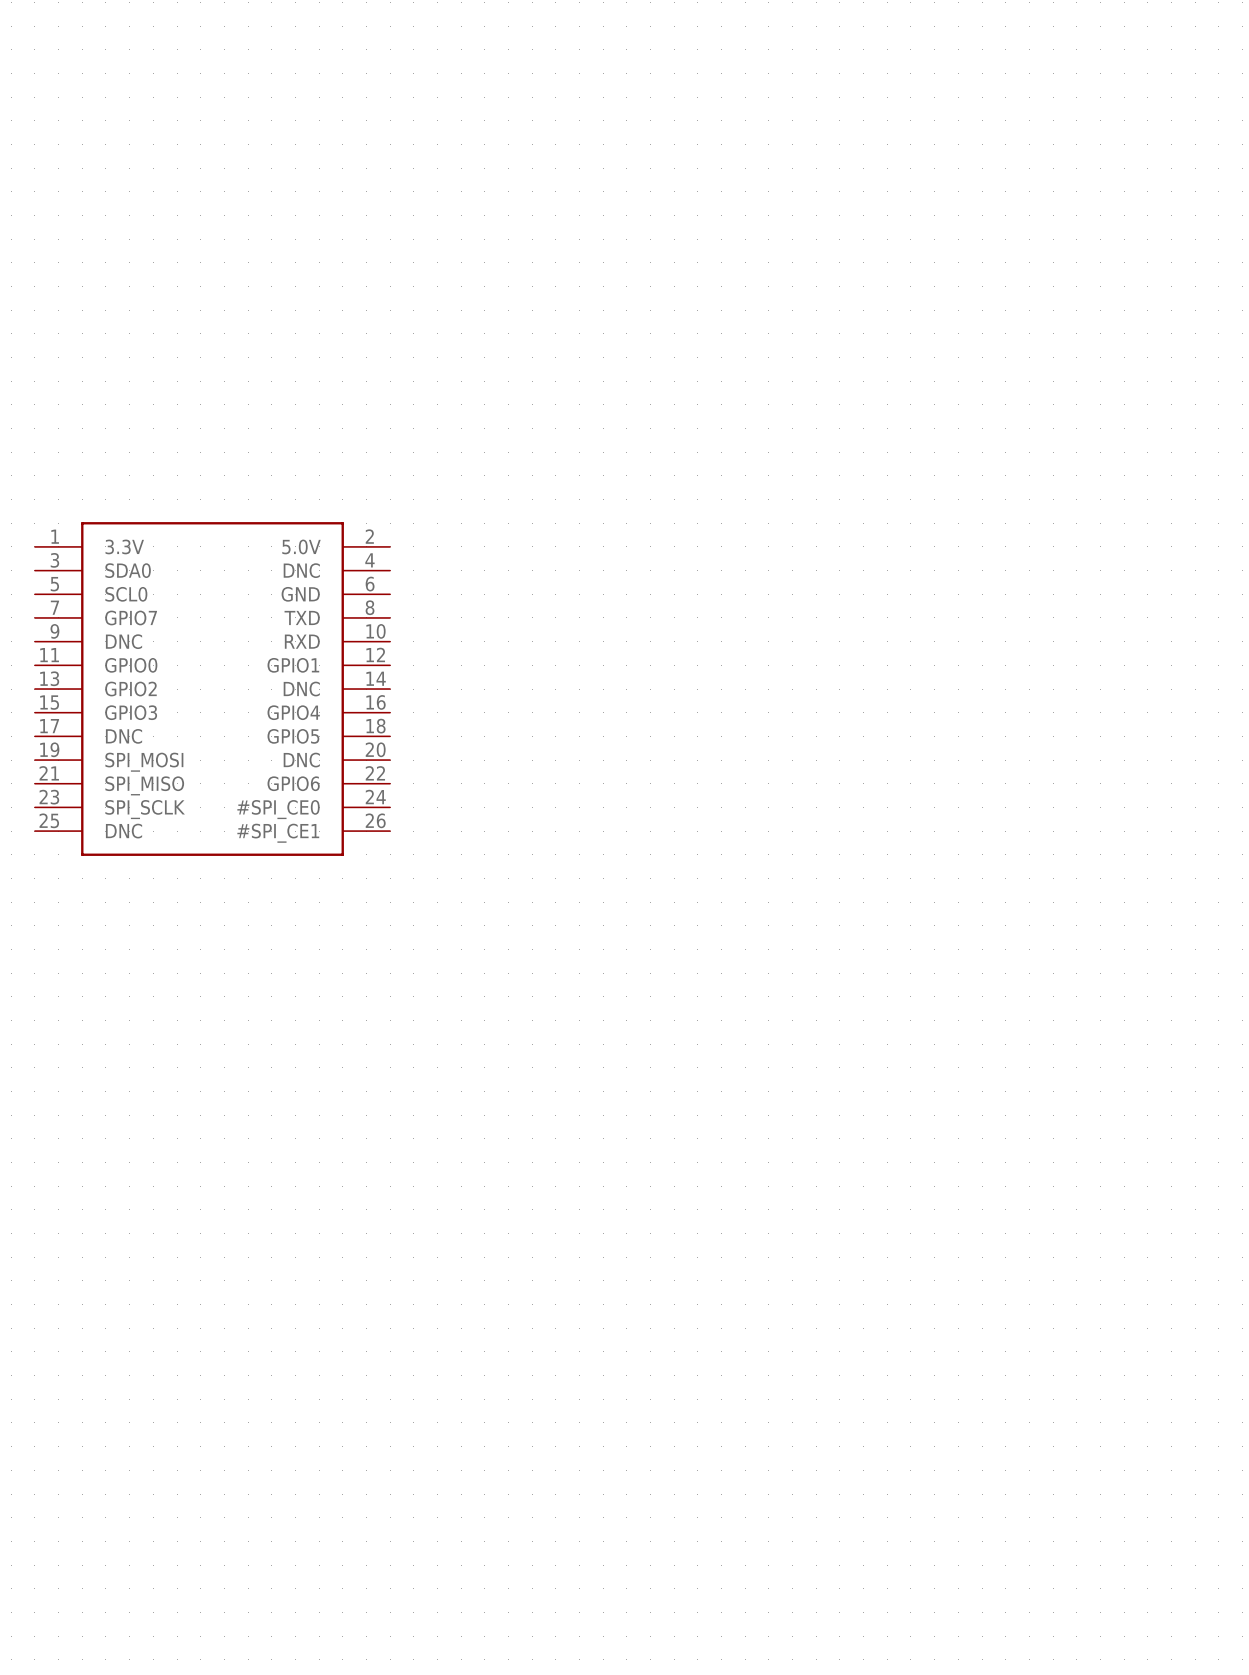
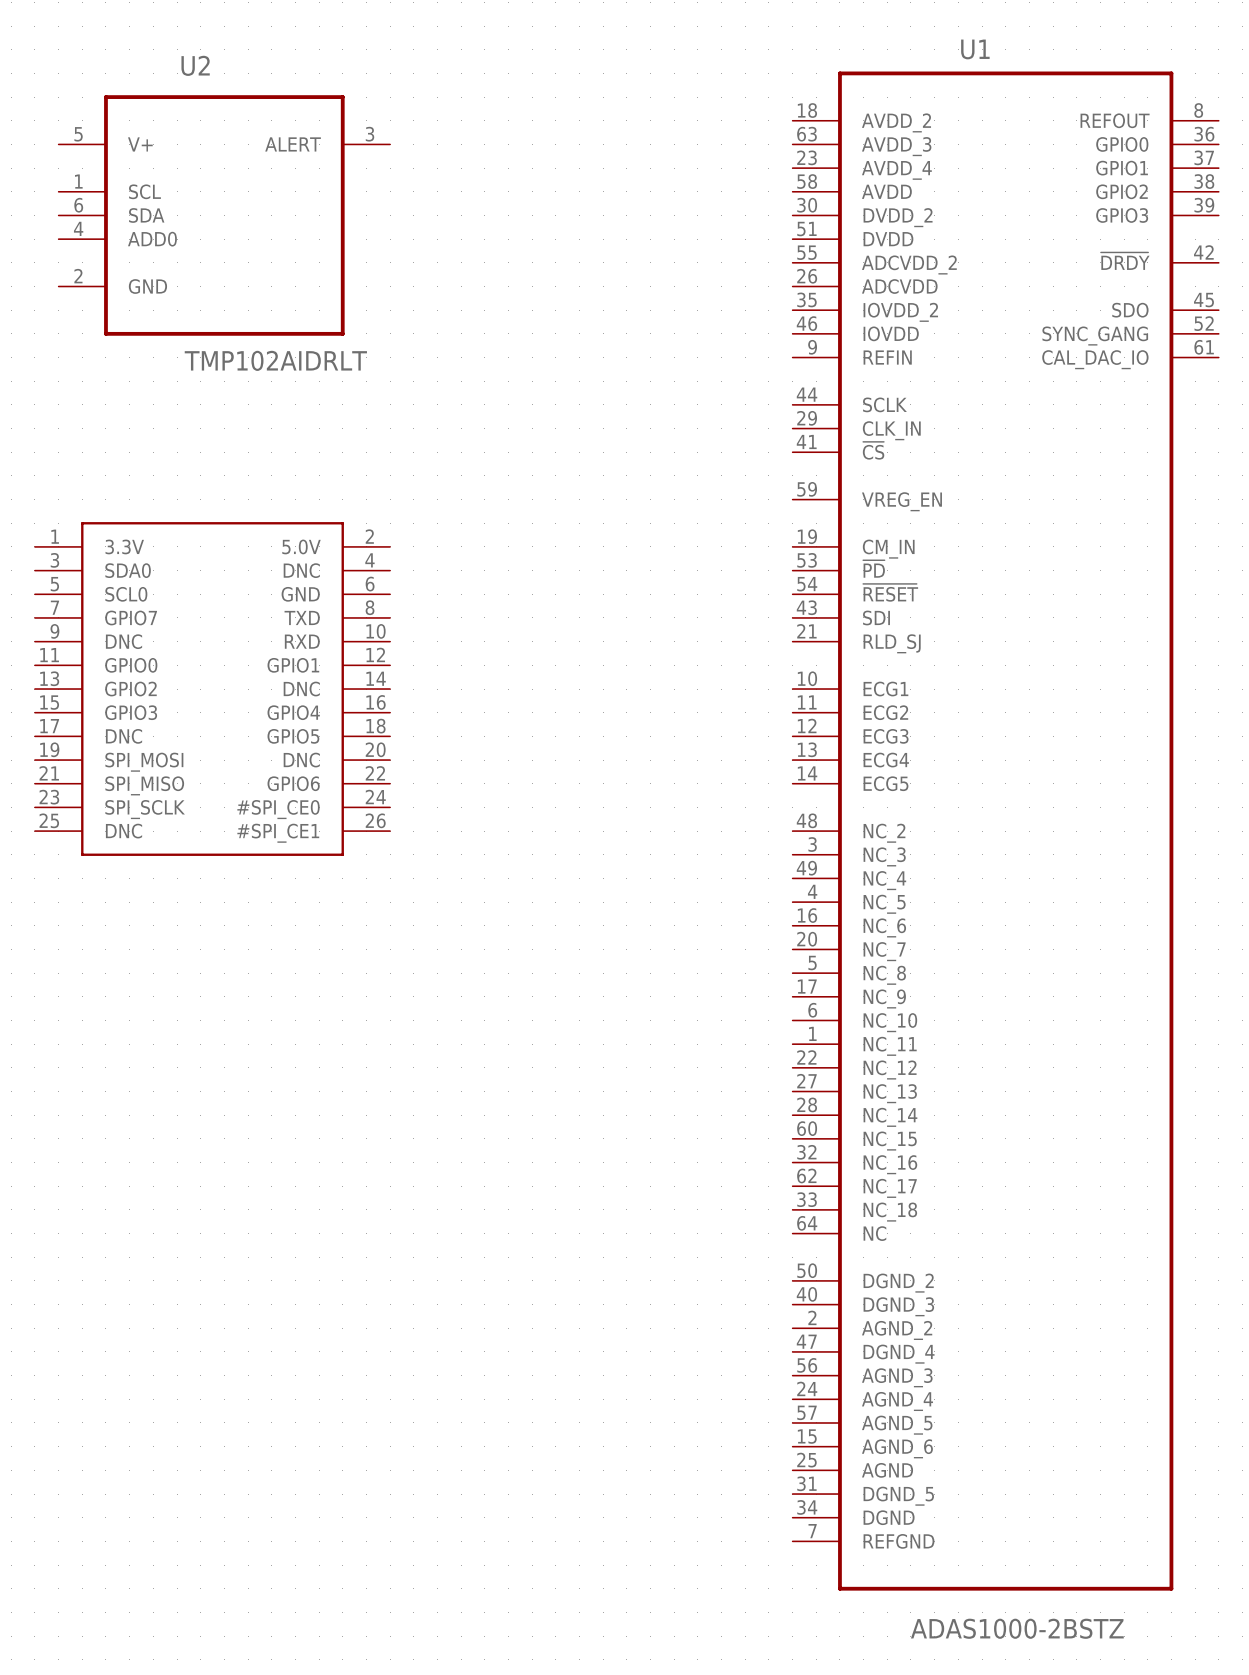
U2: none -> TMP102AIDRLT (224, 215)
U1: none -> ADAS1000-2BSTZ (1005, 831)

